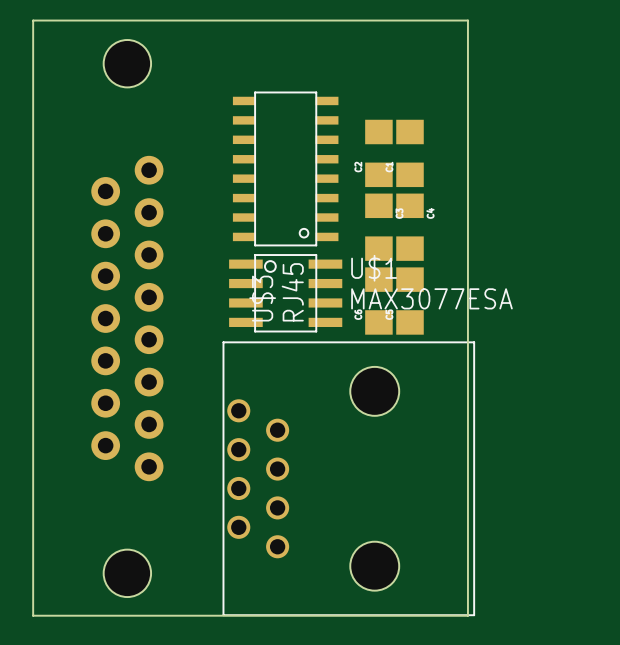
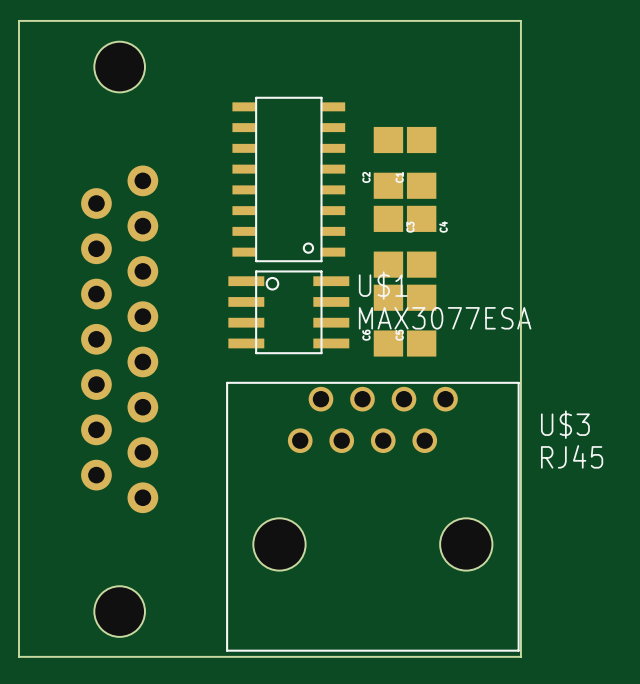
board edge: (467, 20) (467, 615) -> (483, 20) (520, 20) (520, 656) (483, 656)
U$3 rotation: 0° (348, 478) -> 90° clockwise (372, 516)

